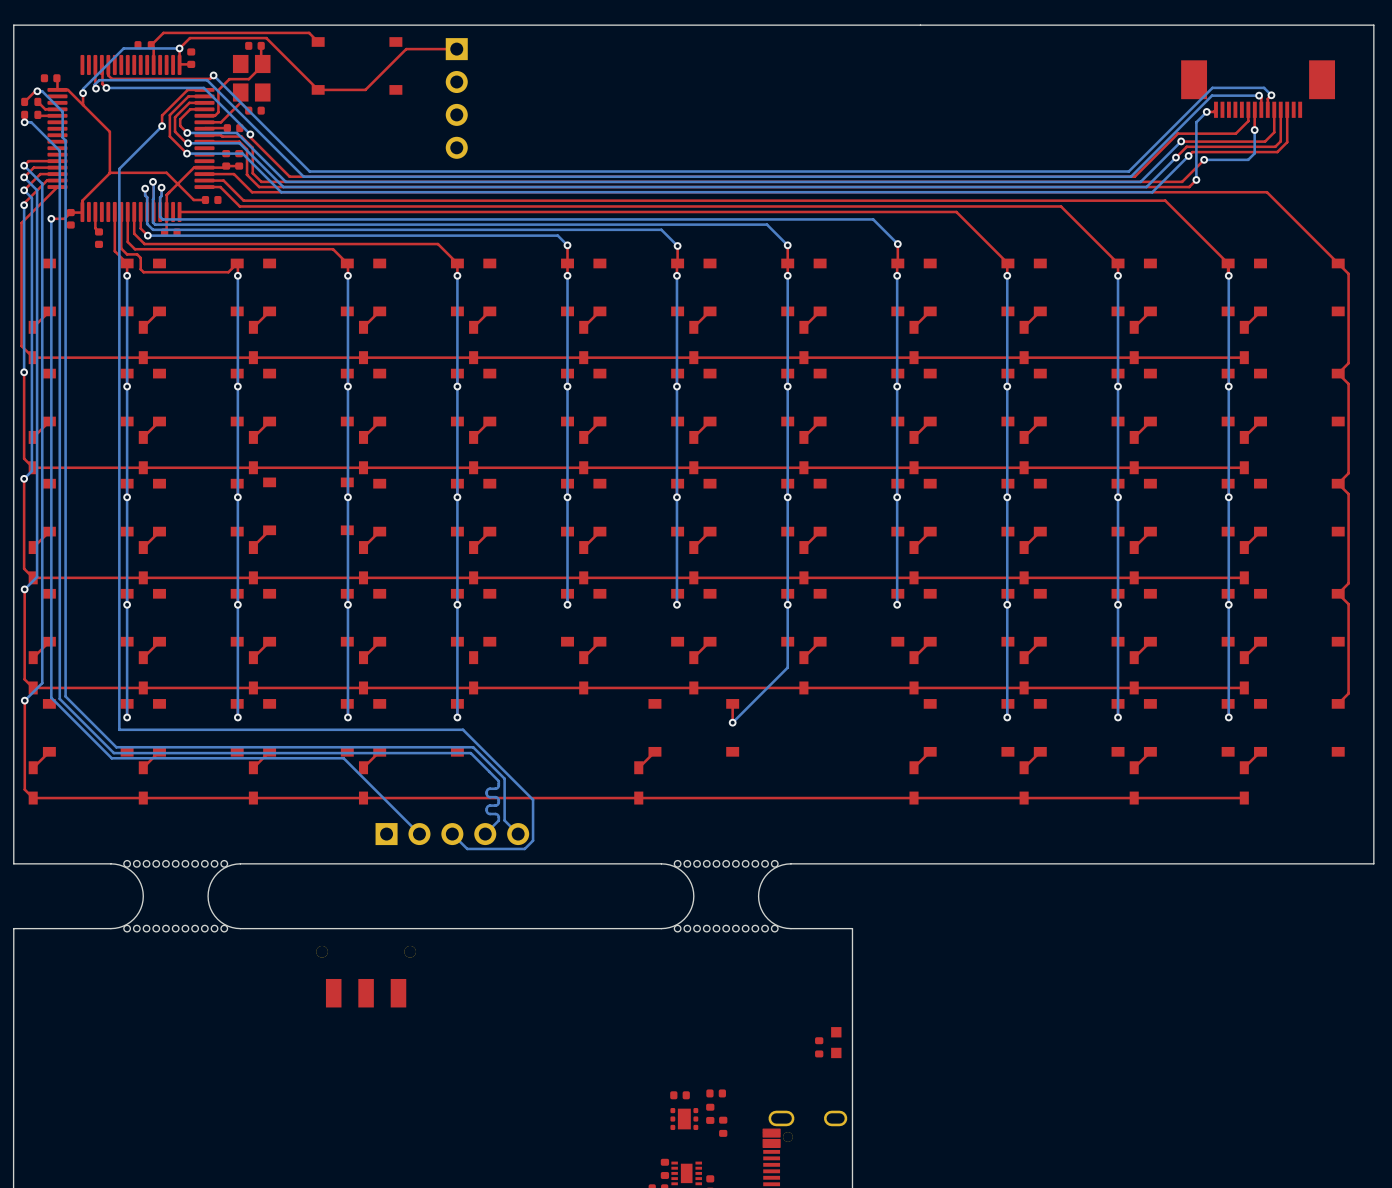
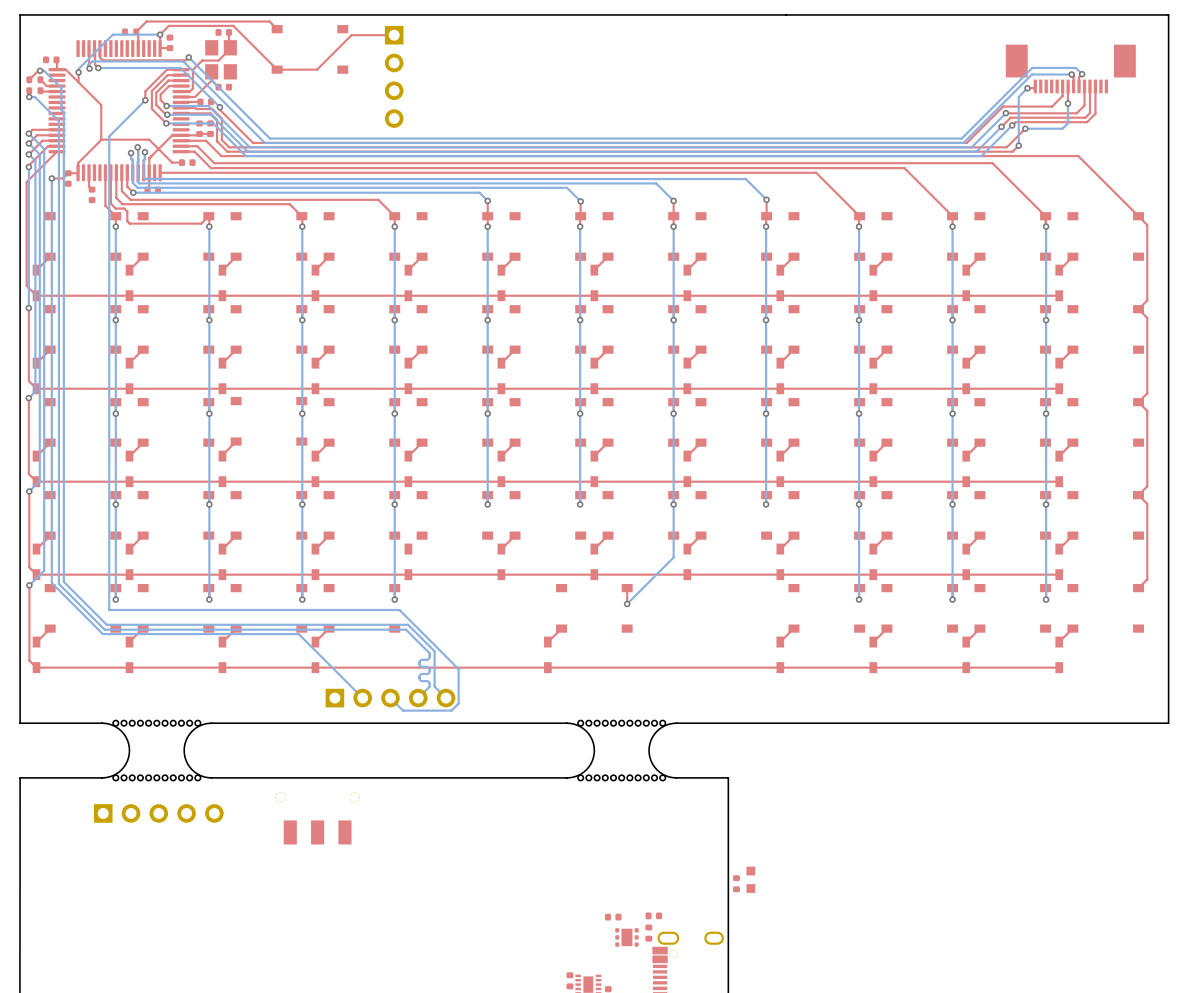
part: none -> (158, 813)
part position: (836, 1042) -> (750, 879)
part position: (819, 1047) -> (736, 883)
part position: (680, 1095) -> (653, 915)
part: none -> (648, 933)
part: (710, 1113) -> none
part position: (684, 1119) -> (626, 937)
part: (723, 1126) -> none

